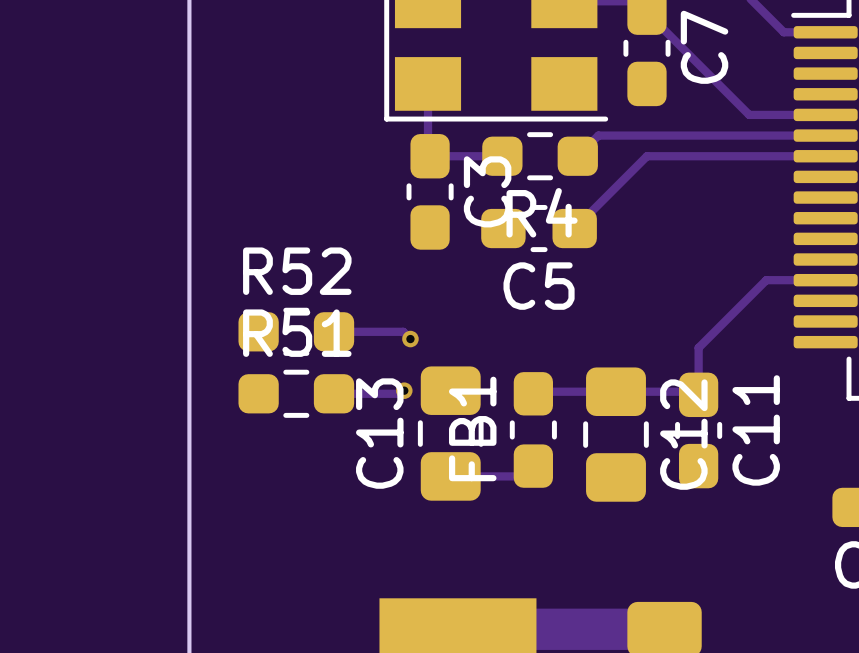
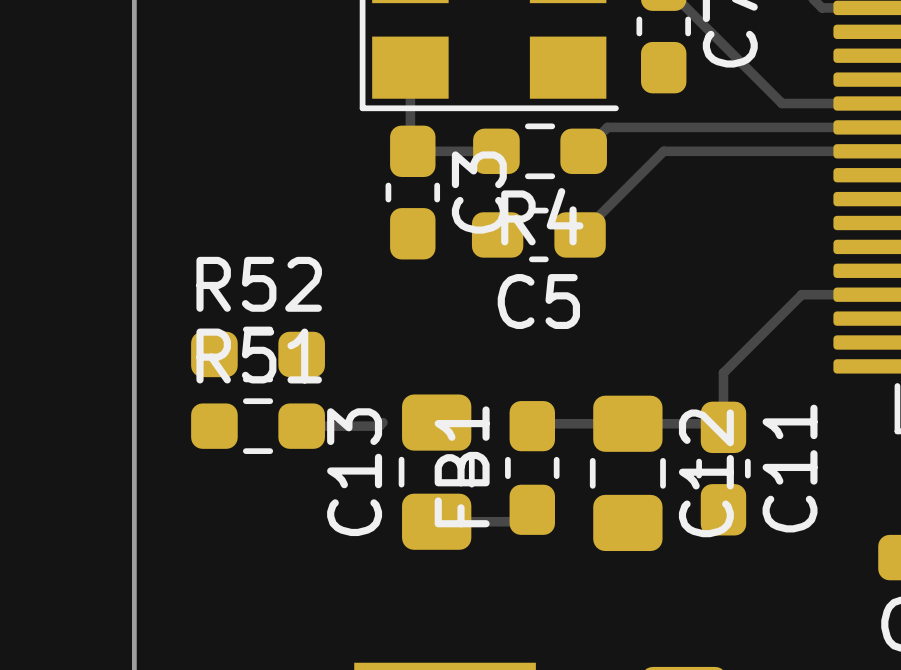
track: (334, 331) (403, 331) (410, 339) -> none
via: (410, 339) -> none
via: (404, 390) -> none

